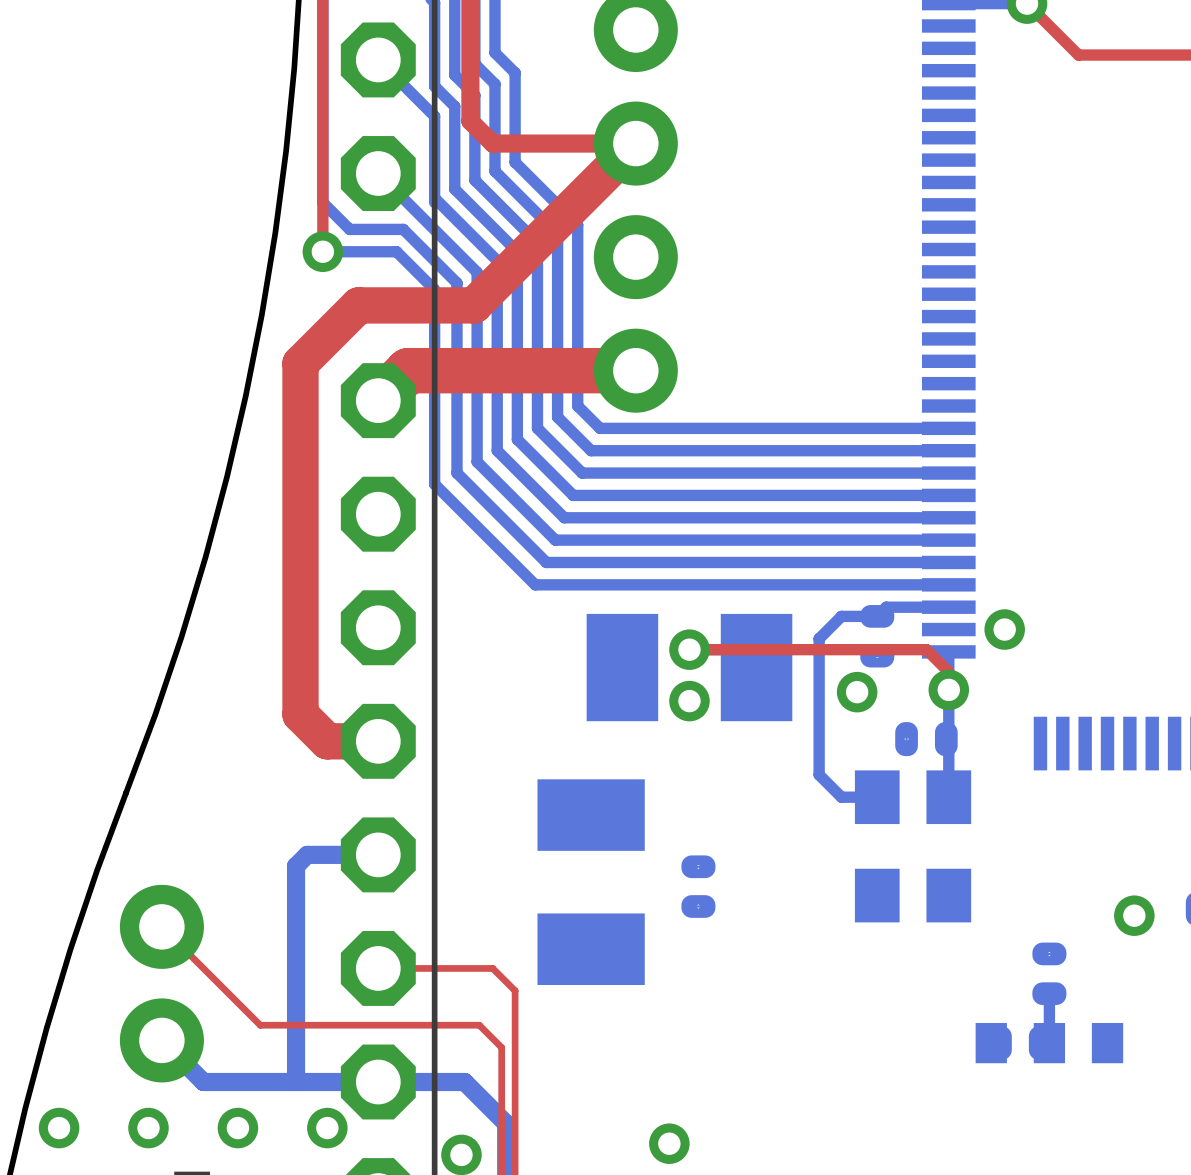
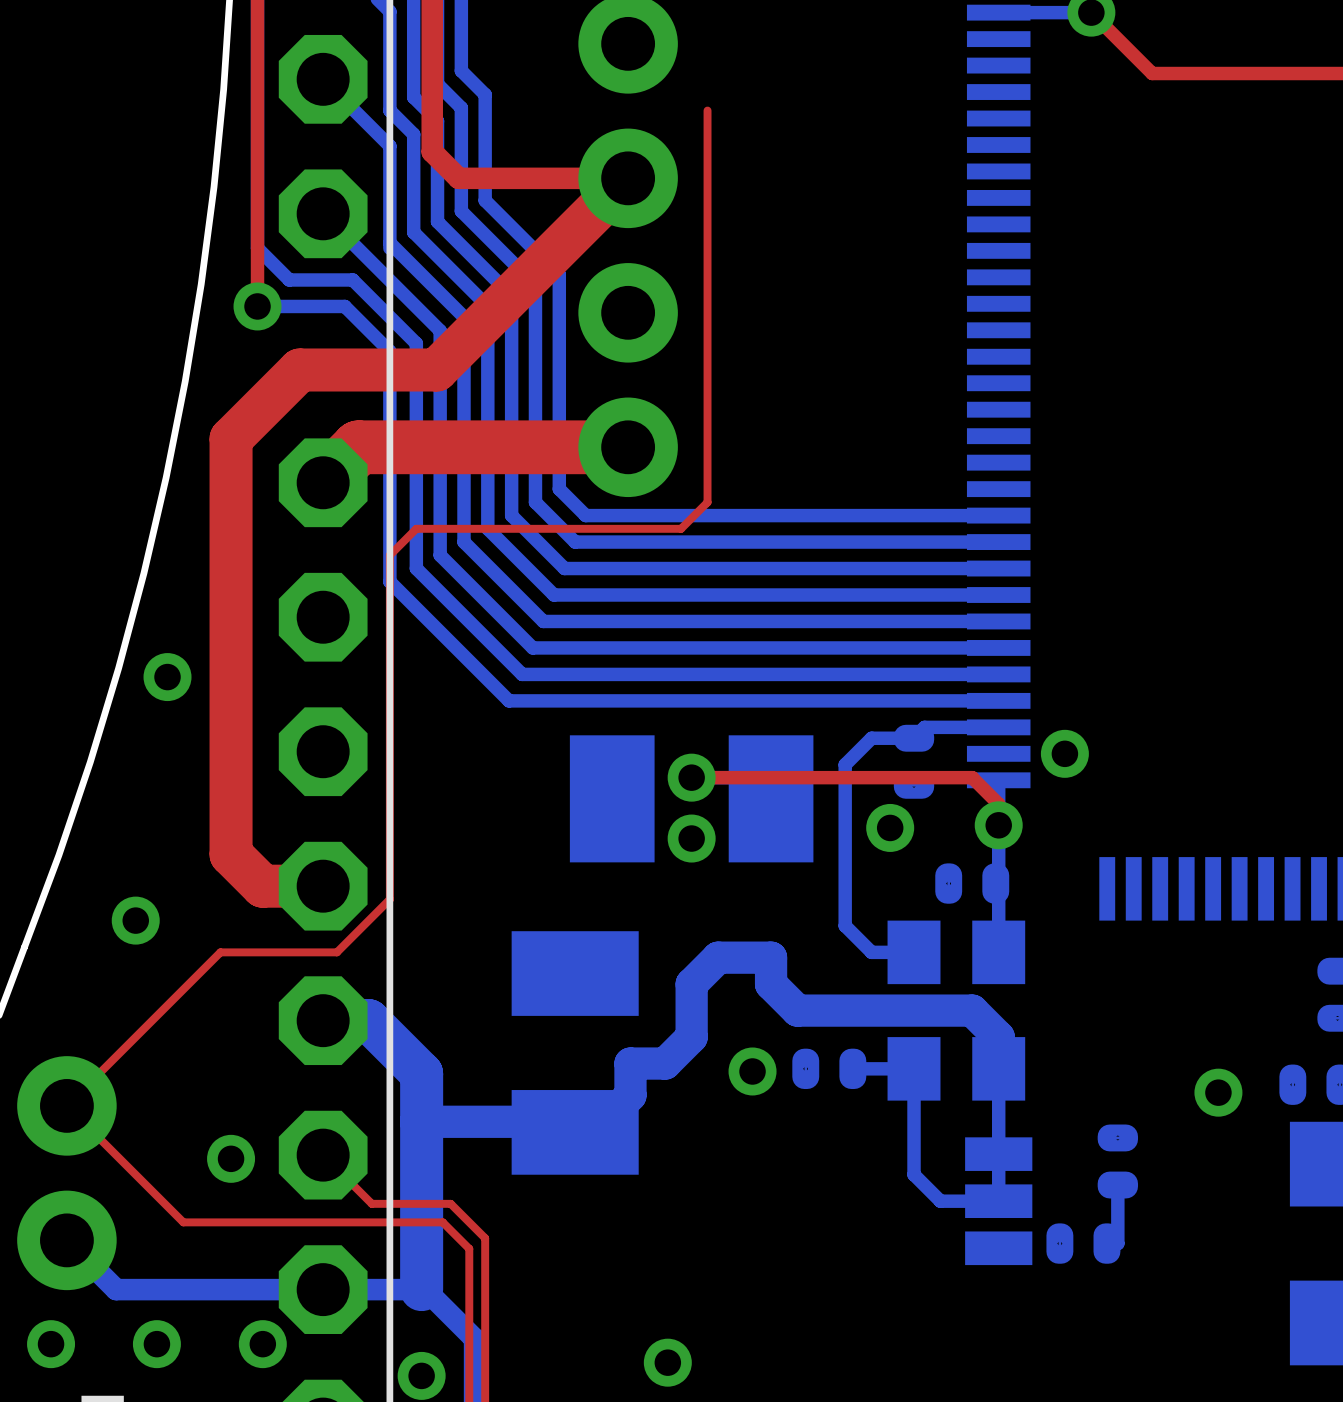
top track: none -> (707, 110) (707, 502) (681, 528) (416, 528) (389, 555) (389, 899) (336, 952) (220, 952) (66, 1105)
via: none -> (167, 677)
via: none -> (135, 920)
bottom track: (378, 854) (307, 854) (296, 866) (296, 1082) -> (323, 1020) (368, 1020) (421, 1073) (421, 1289)
part rotation: 0° (698, 886) -> 90° clockwise (829, 1068)
part position: (698, 886) -> (829, 1068)
bottom track: none -> (852, 1068) (914, 1068) (914, 1174) (940, 1201) (998, 1201) (998, 1156)
via: none -> (752, 1071)
bottom track: none -> (421, 1121) (604, 1121) (630, 1095) (630, 1063) (665, 1063) (691, 1037) (691, 984) (718, 957) (771, 957) (771, 984) (797, 1010) (972, 1010) (998, 1037) (998, 1154)
top track: (378, 968) (492, 968) (515, 990) (515, 1038) -> (323, 1155) (371, 1203) (450, 1203) (485, 1238)
via: none -> (231, 1158)
part: none -> (998, 1201)
part: (1049, 1043) -> none

